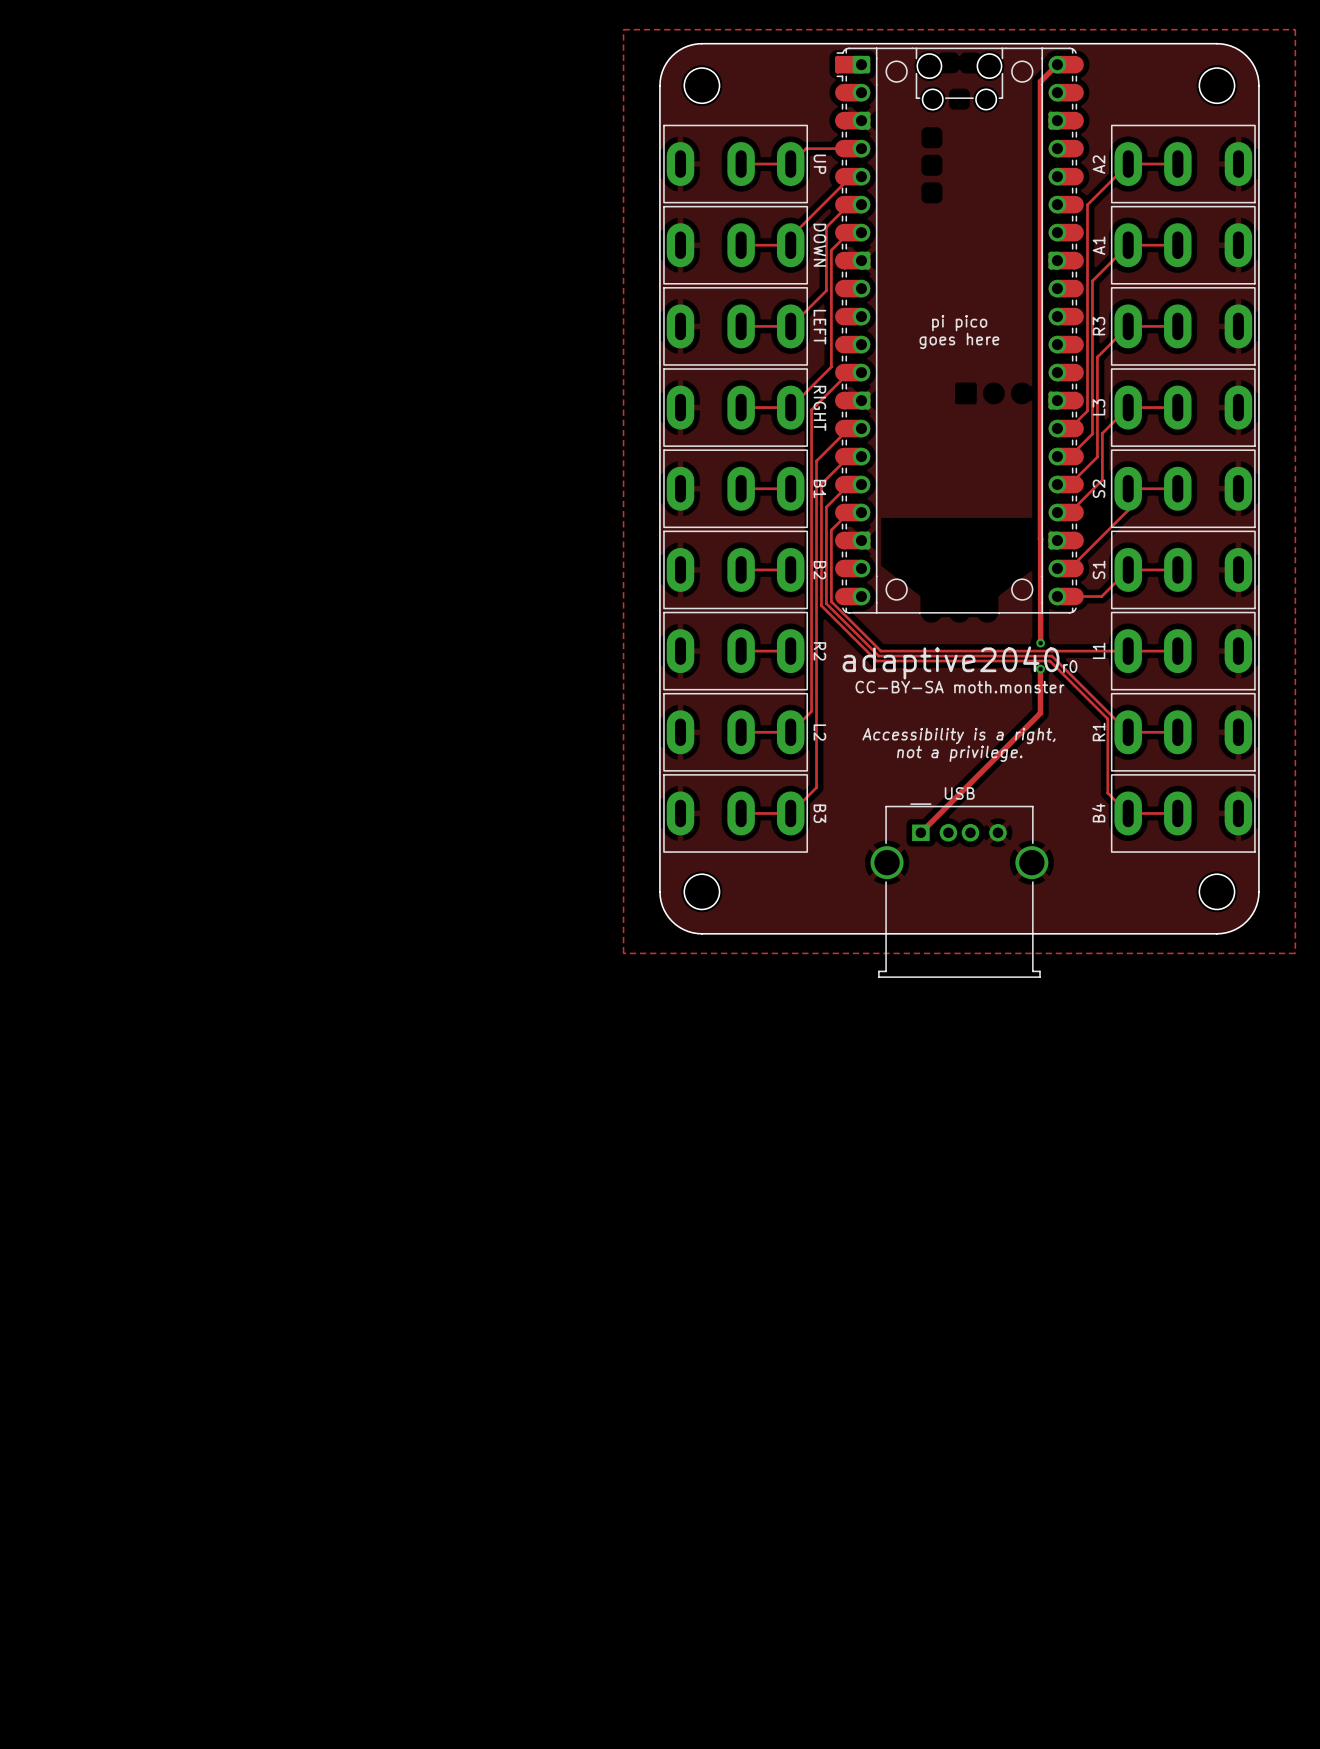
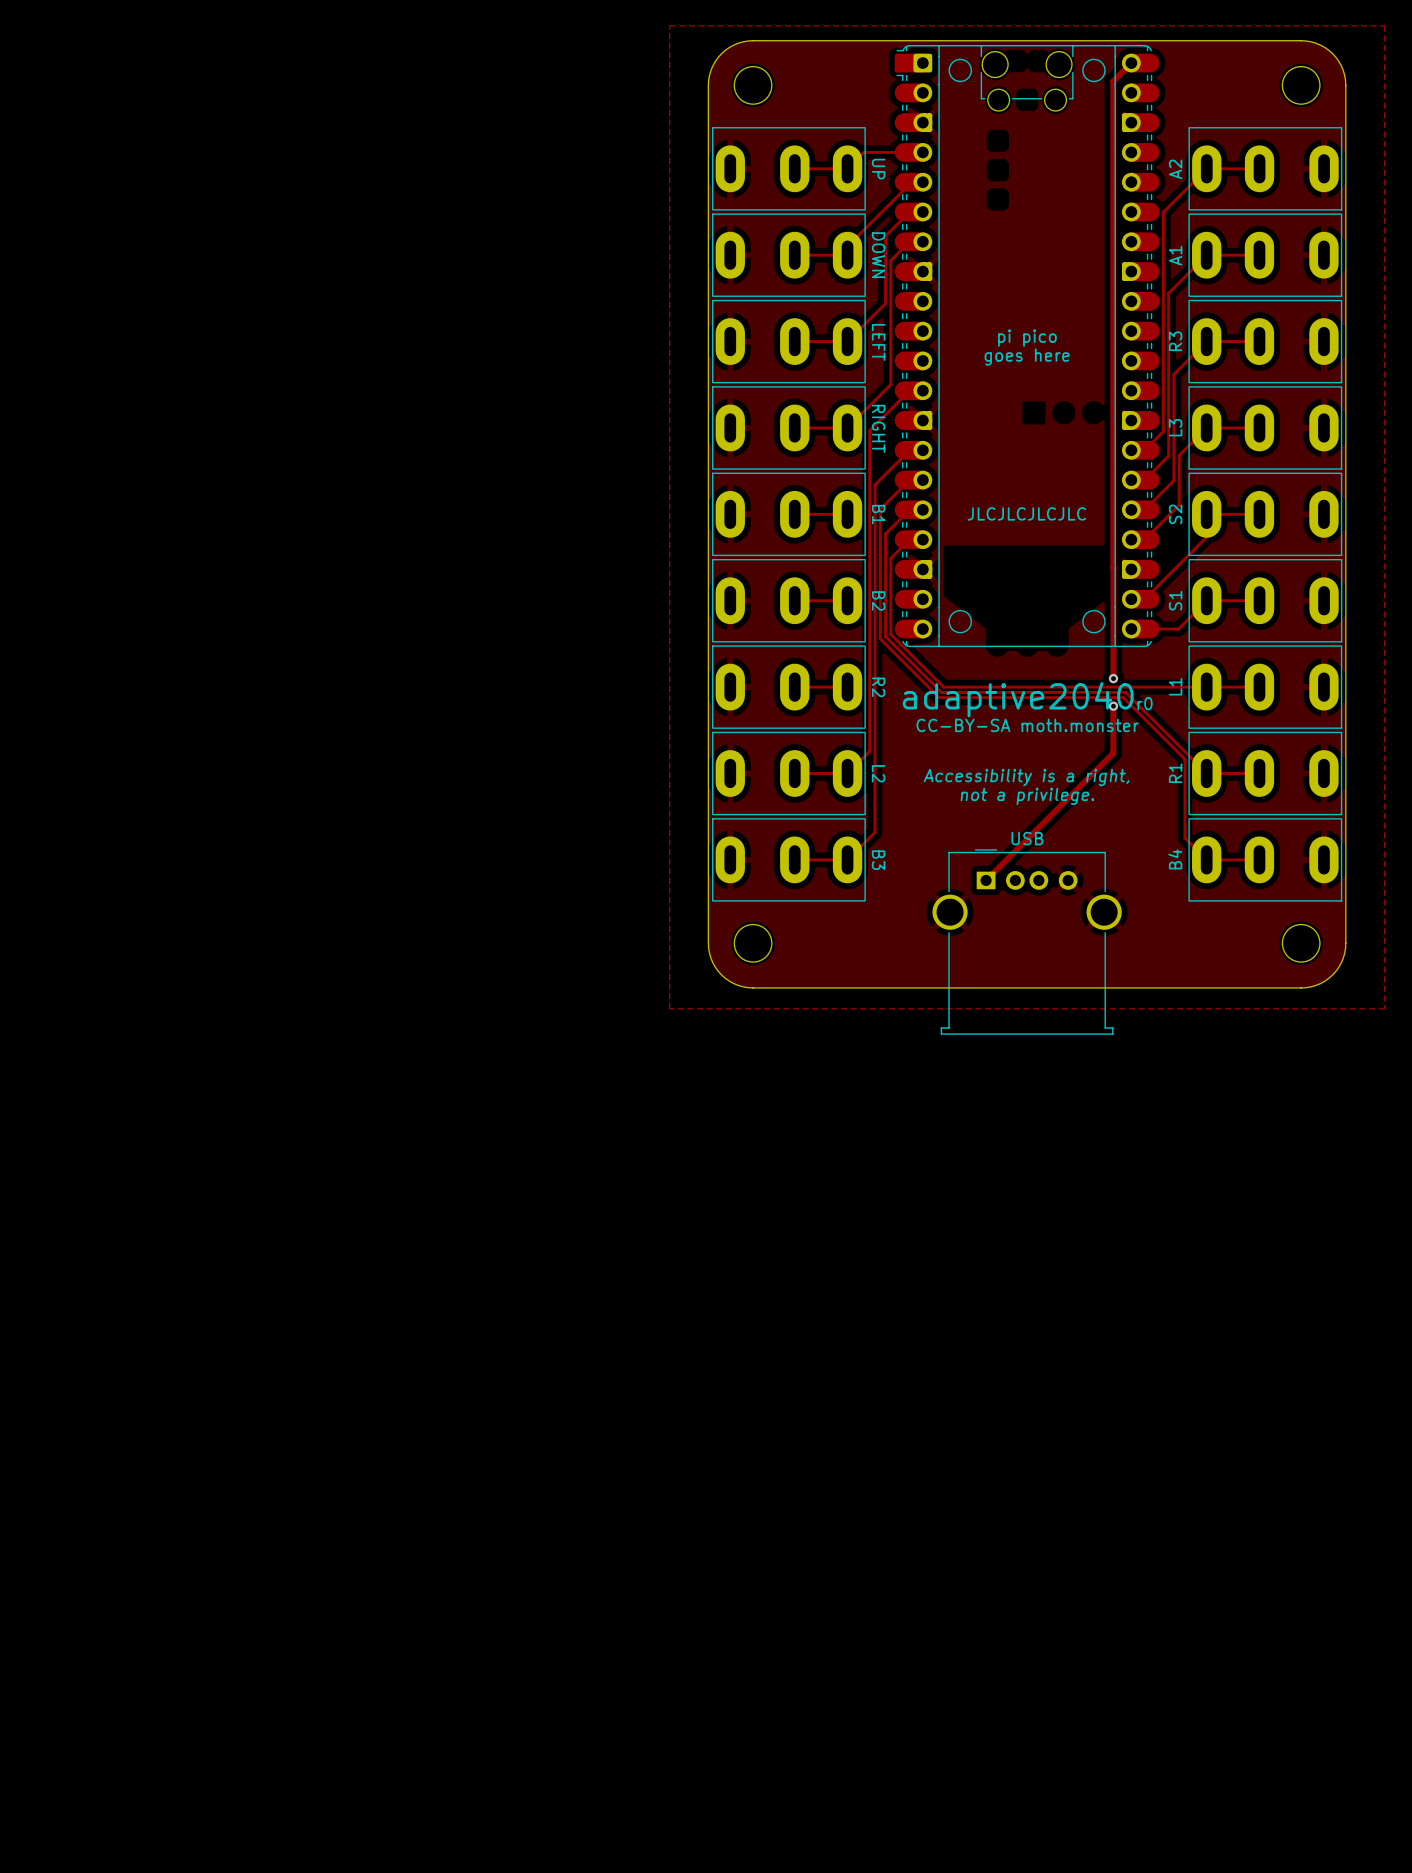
text: none -> JLCJLCJLCJLC (1026, 513)

